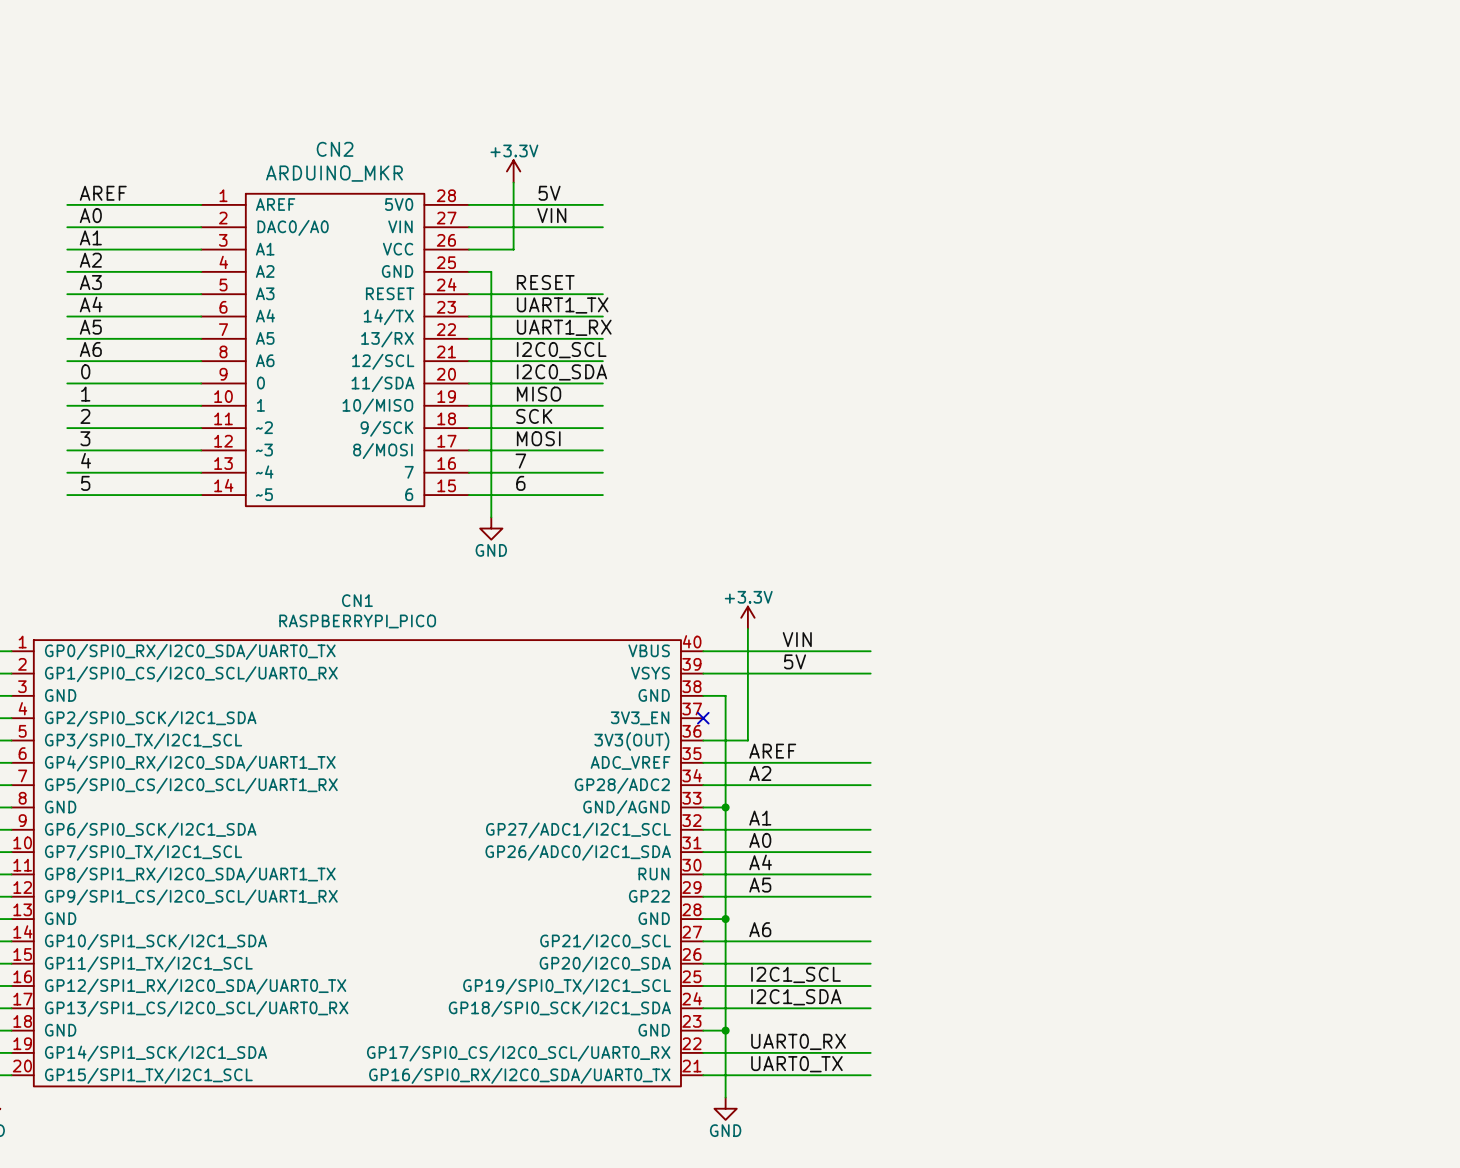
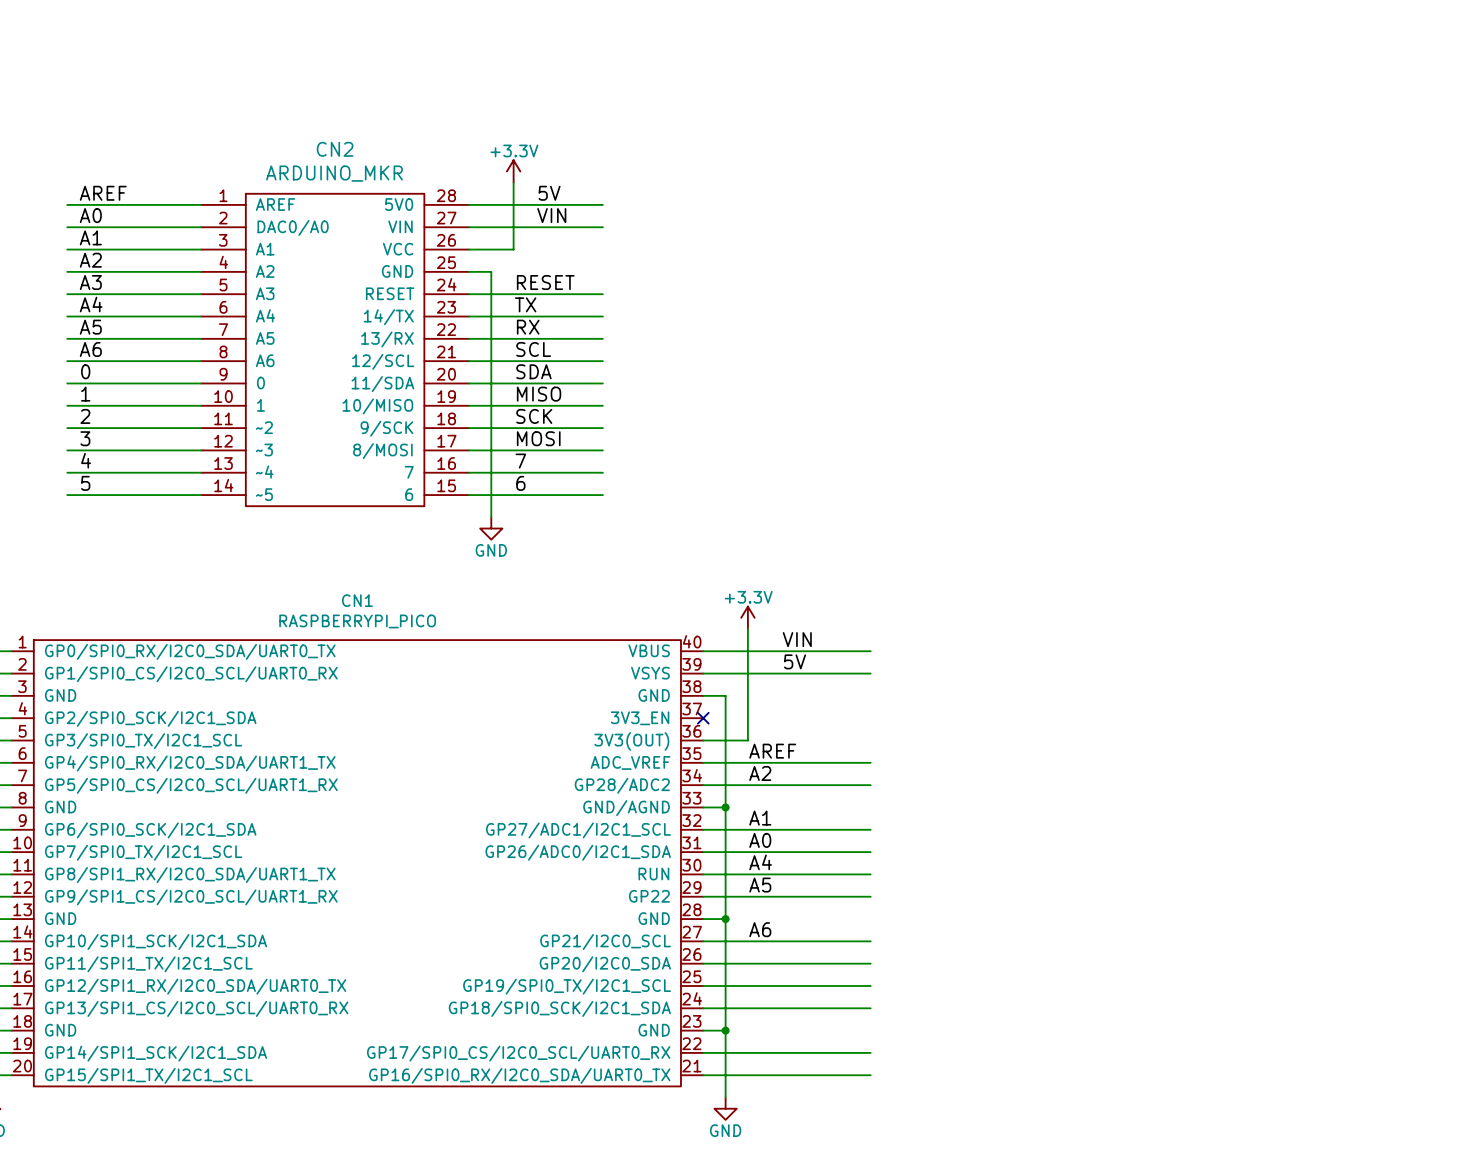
label: UART1_TX (562, 305) -> TX (525, 304)
label: UART1_RX (564, 327) -> RX (528, 327)
label: I2C0_SCL (561, 350) -> SCL (533, 349)
label: I2C0_SDA (561, 372) -> SDA (533, 371)
label: I2C1_SCL (795, 974) -> none
label: I2C1_SDA (796, 997) -> none
label: UART0_RX (798, 1041) -> none
label: UART0_TX (796, 1064) -> none

